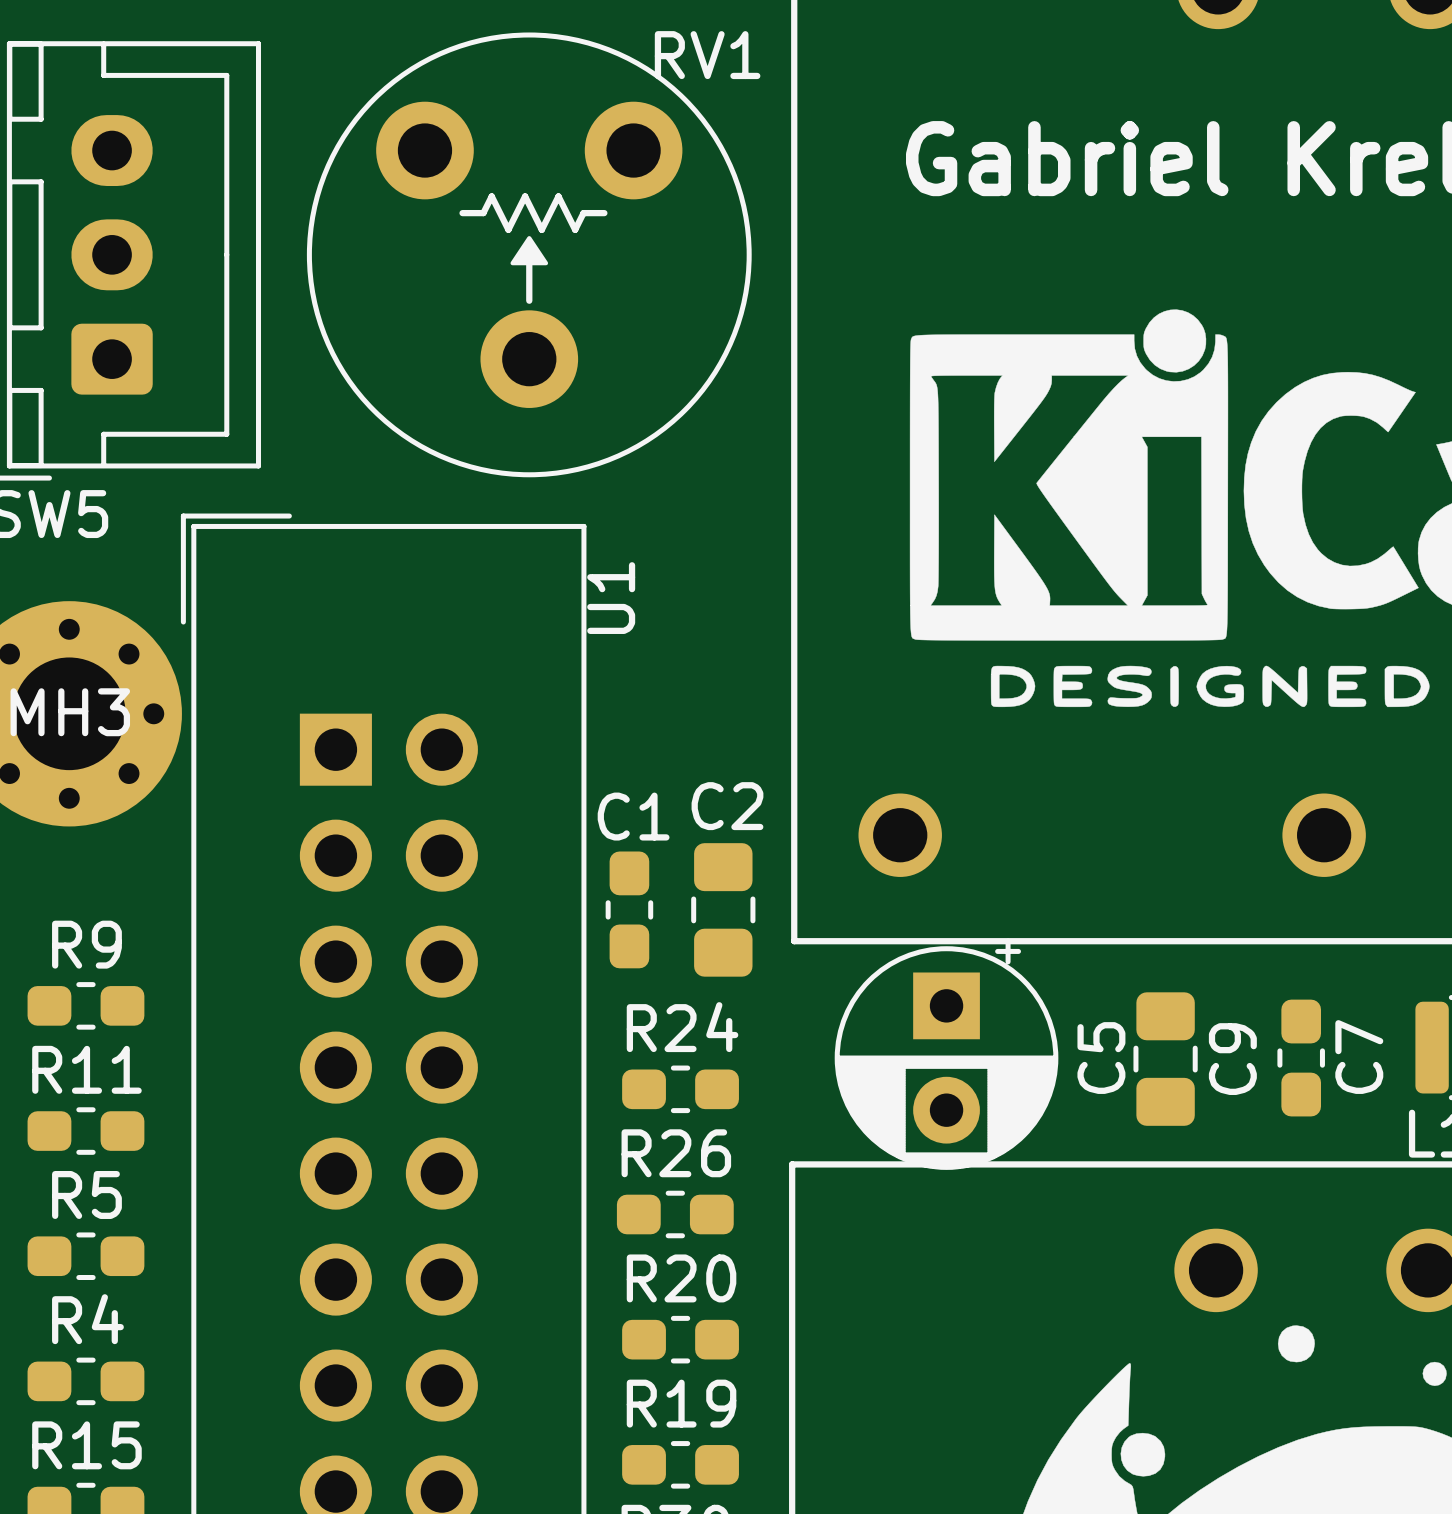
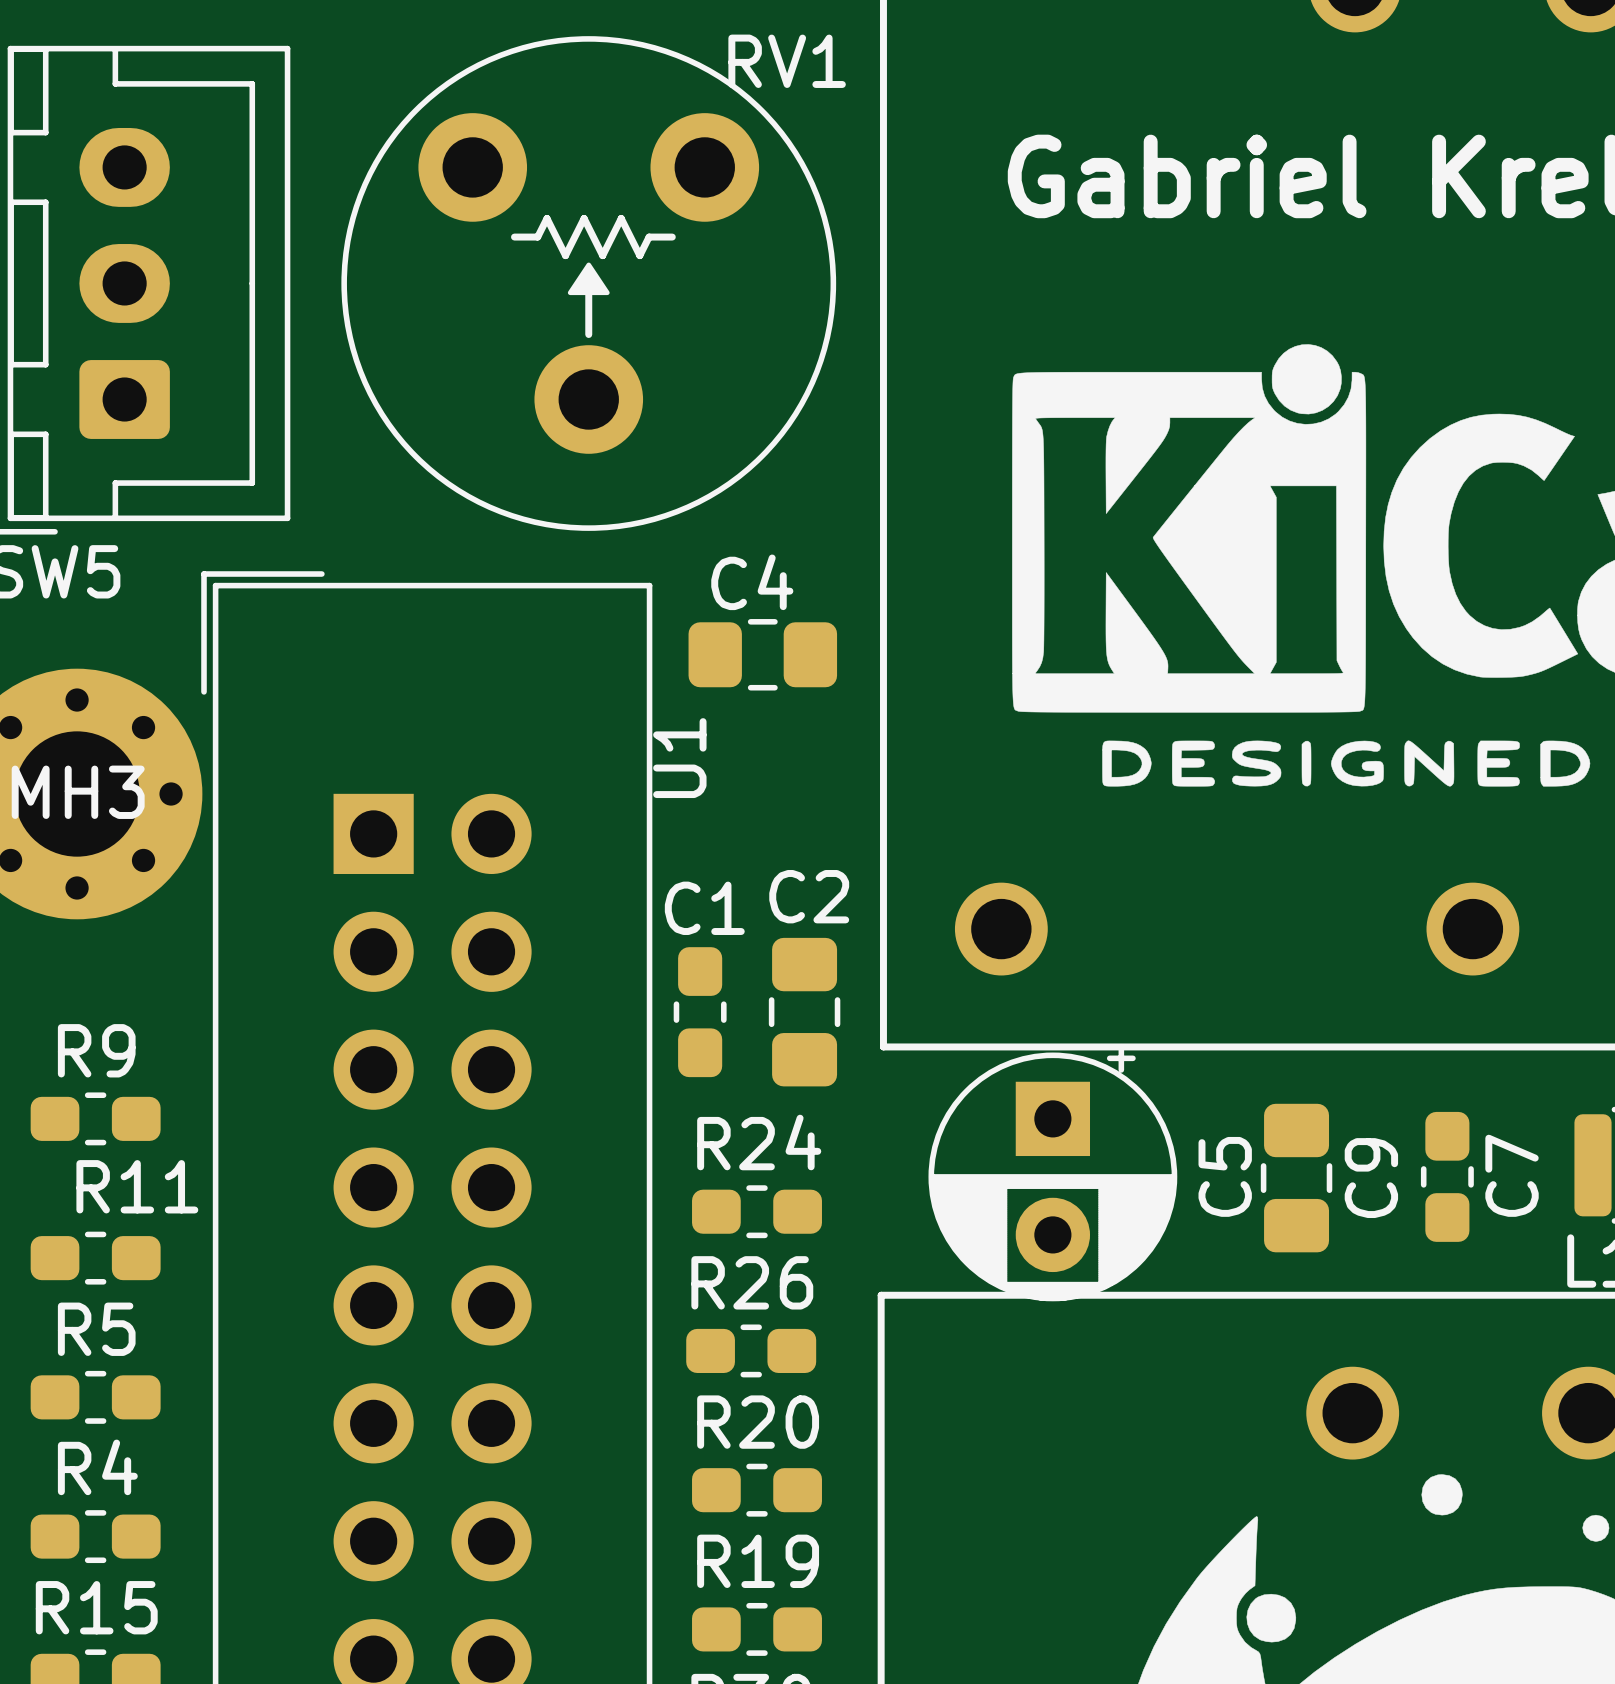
C4: none -> (762, 654)
U1 name position: U1 (611, 598) -> U1 (679, 758)
R11 name position: R11 (86, 1069) -> R11 (137, 1186)

